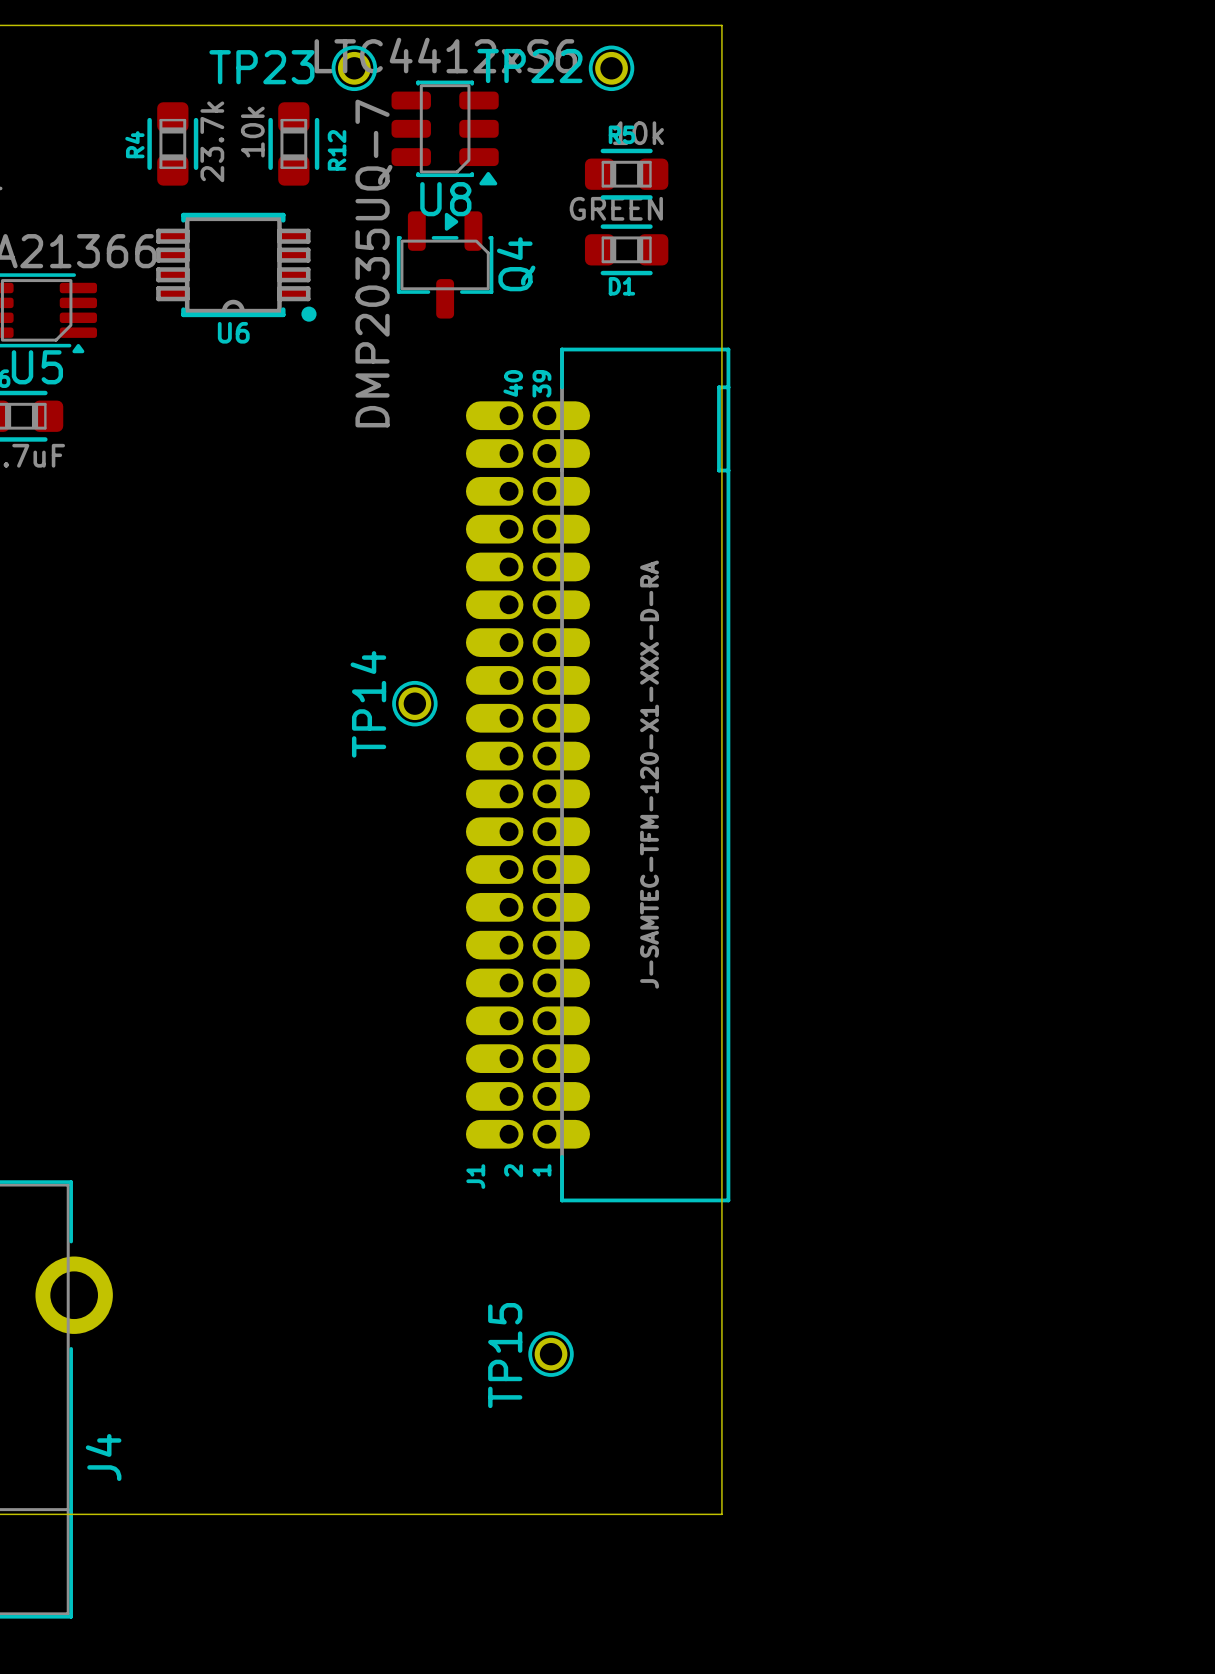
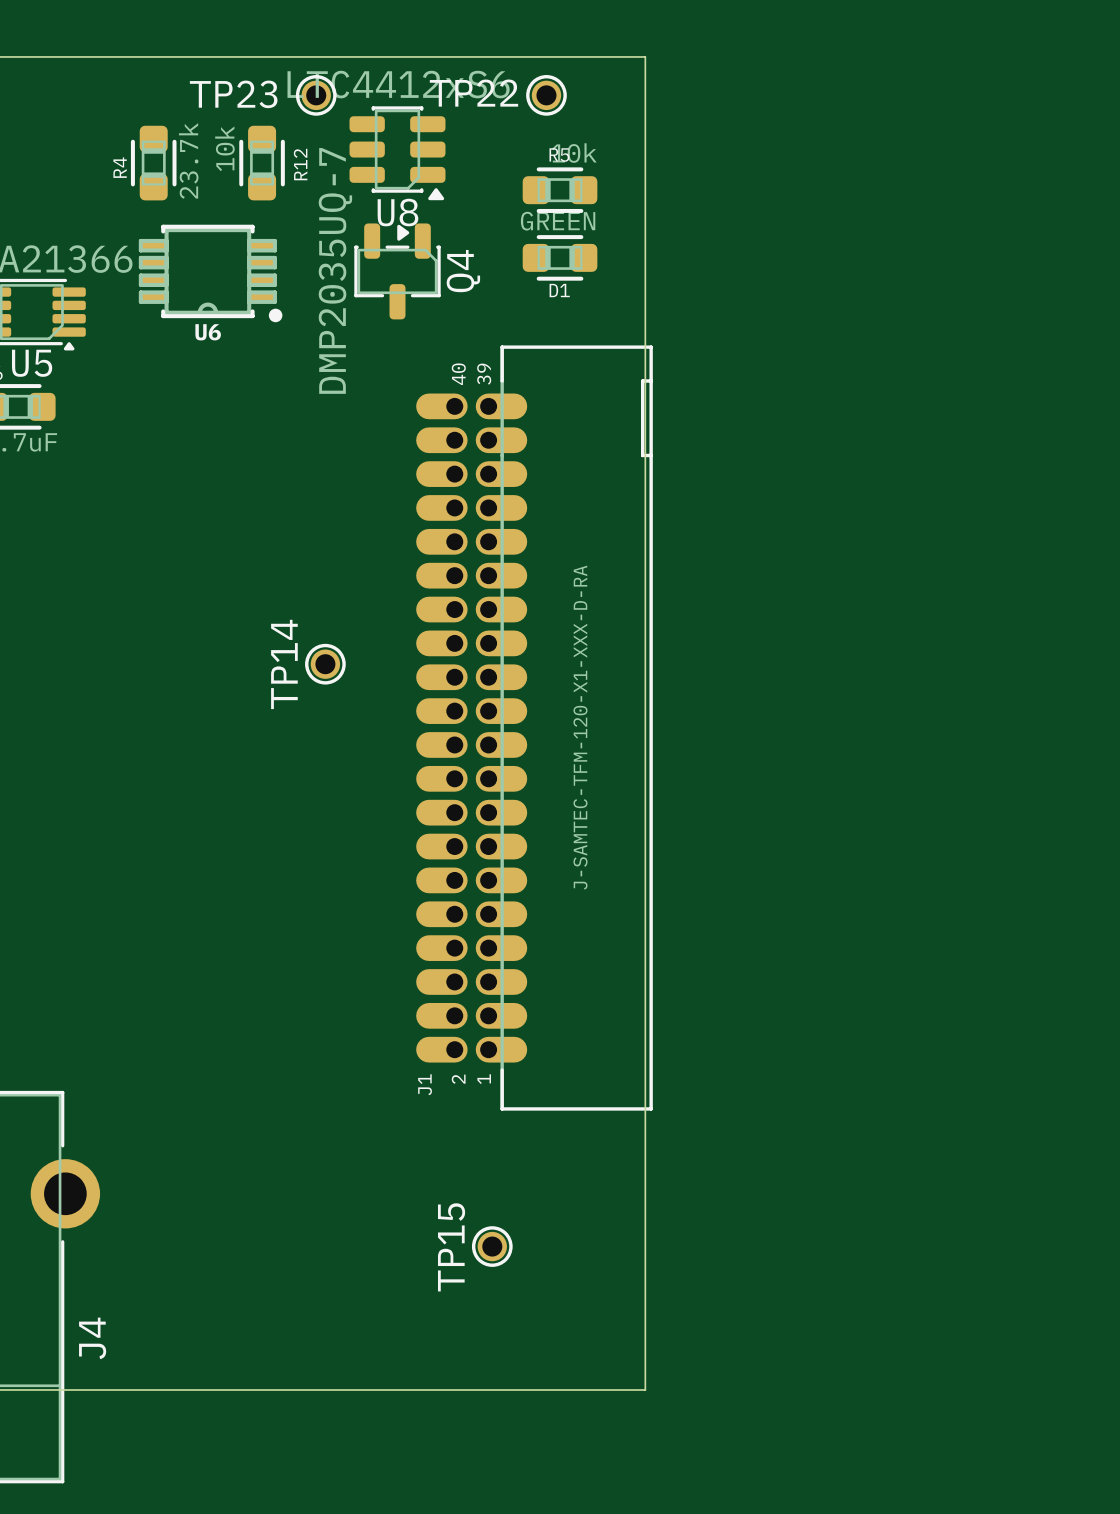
TP14 position: (414, 703) -> (325, 664)

